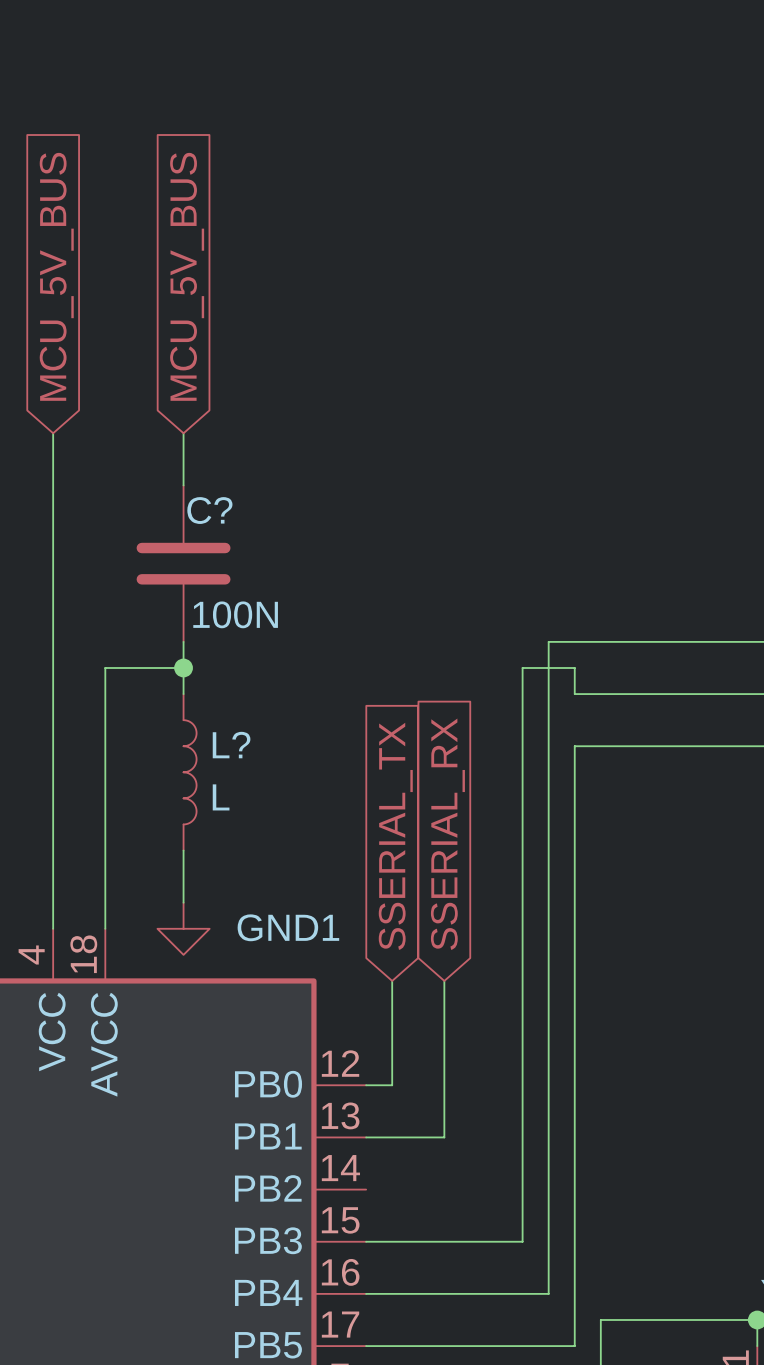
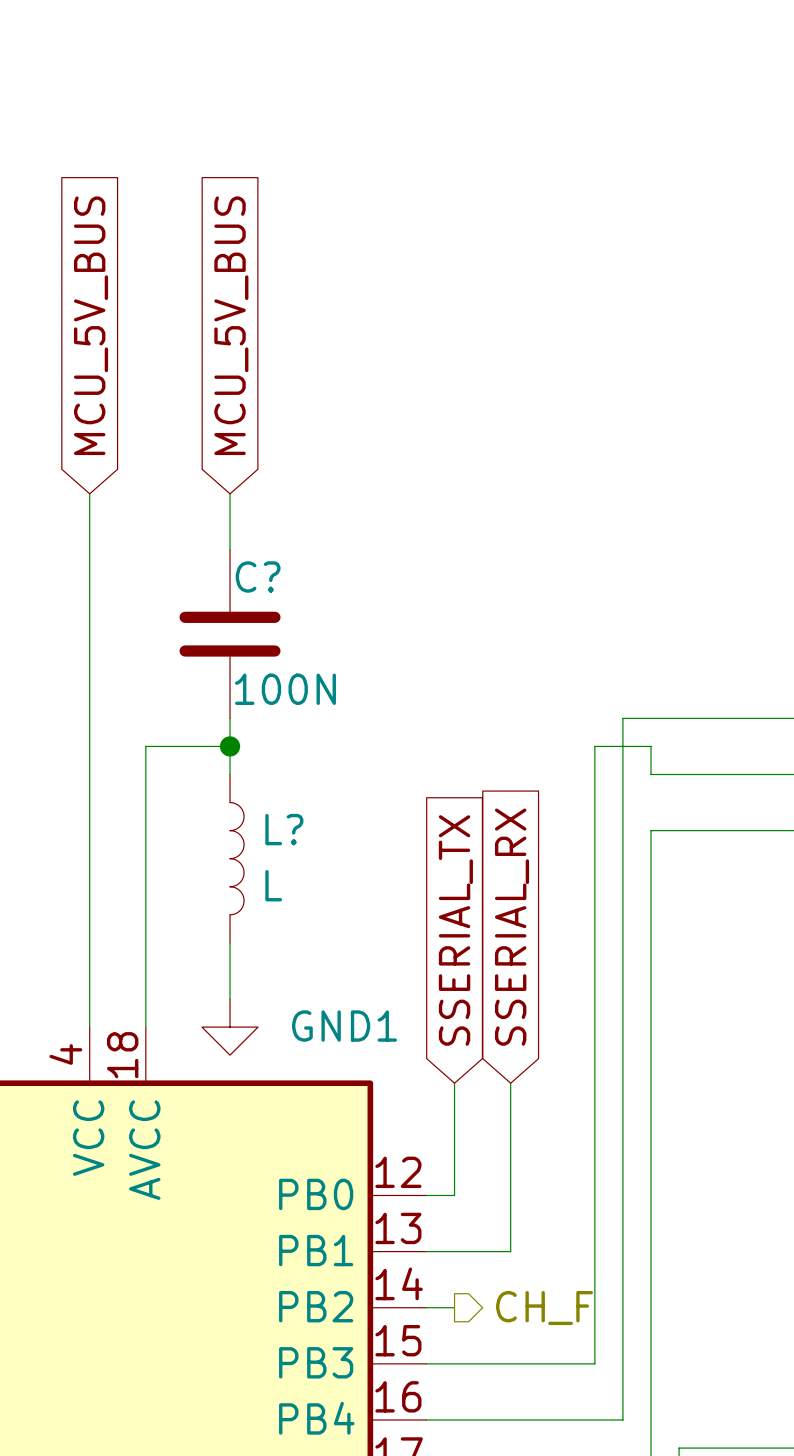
wire: none -> (426, 1307) (454, 1307)
hierarchical label: none -> CH_F (544, 1308)

